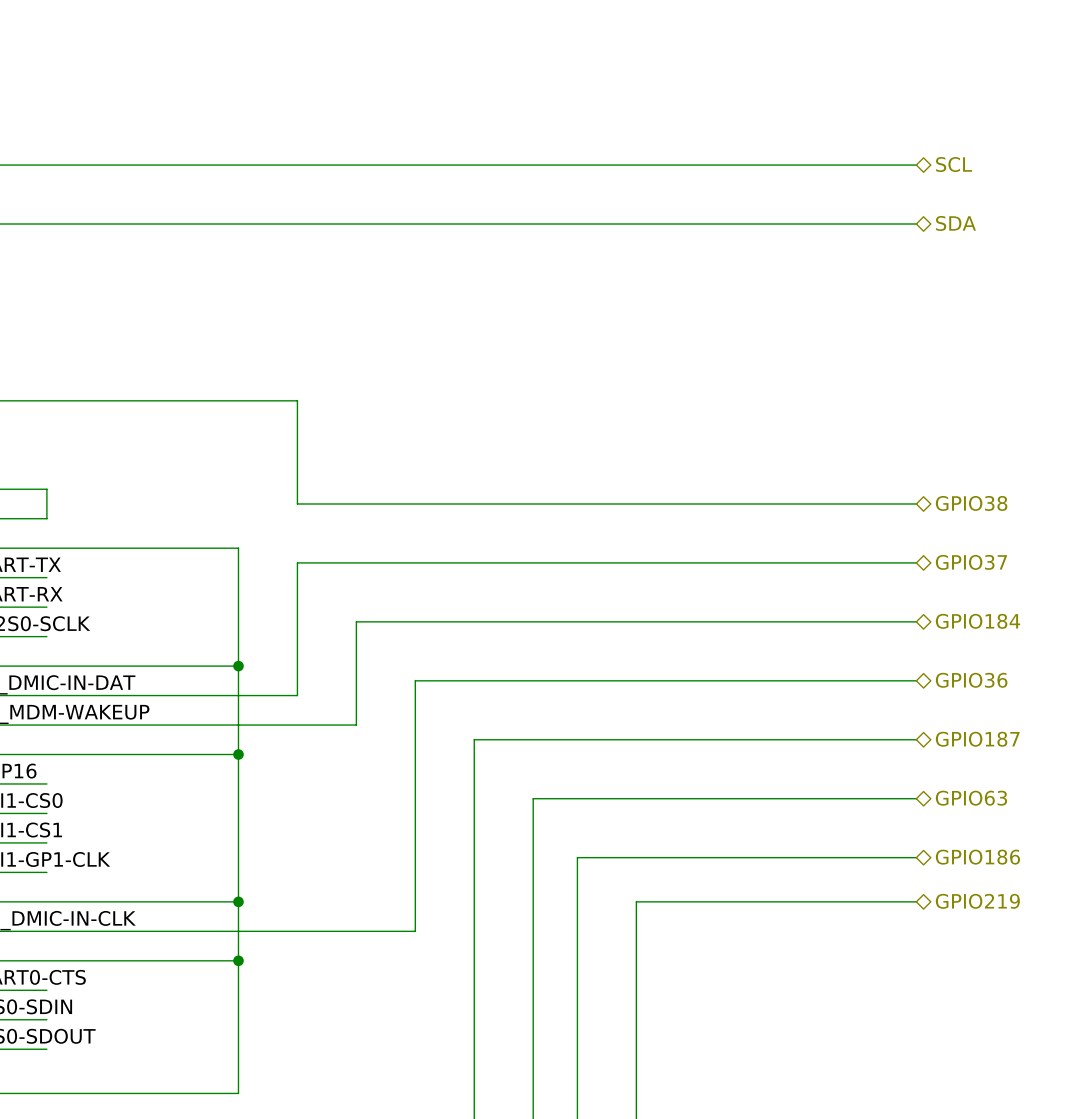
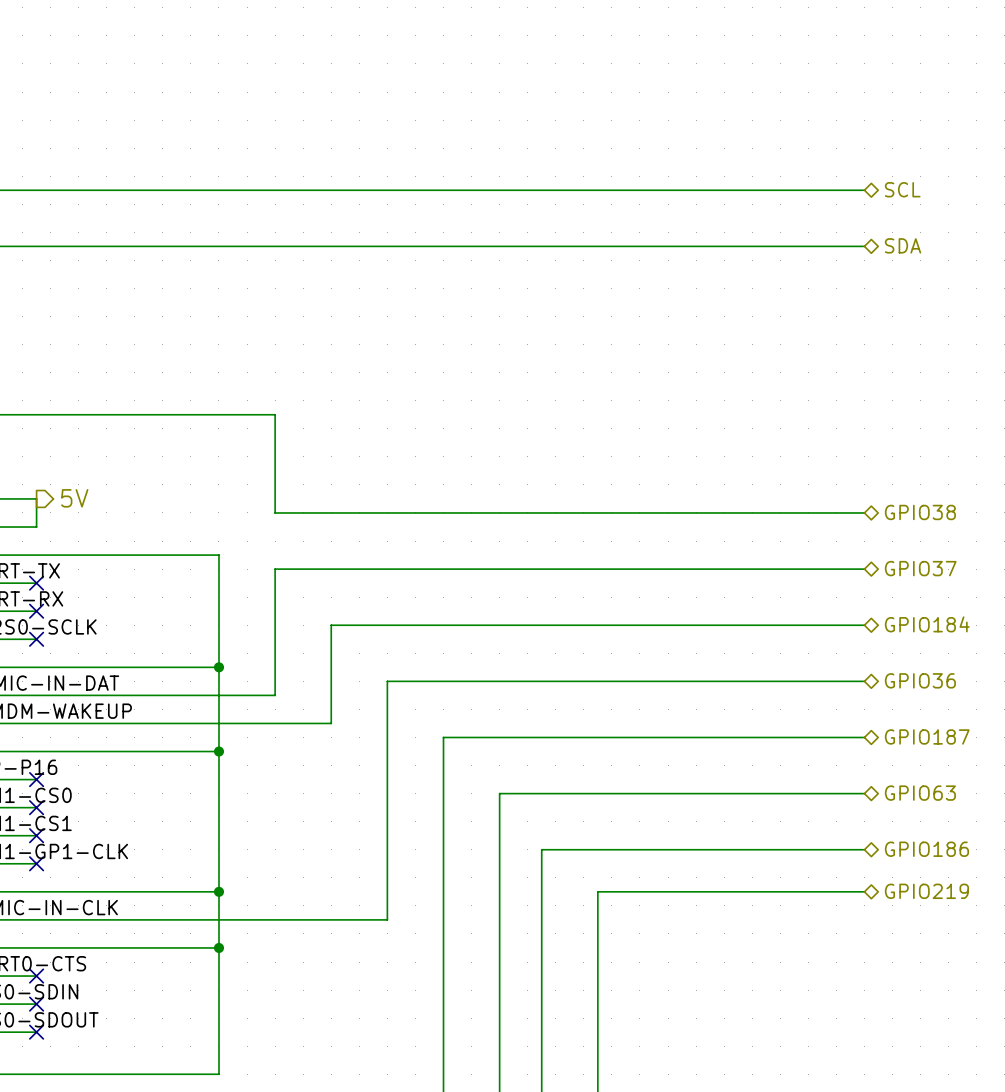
hierarchical label: none -> 5V (74, 498)
no-connect mark: none -> (36, 583)
no-connect mark: none -> (36, 611)
no-connect mark: none -> (36, 639)
no-connect mark: none -> (36, 779)
no-connect mark: none -> (36, 807)
no-connect mark: none -> (36, 835)
no-connect mark: none -> (36, 863)
no-connect mark: none -> (36, 976)
no-connect mark: none -> (36, 1004)
no-connect mark: none -> (36, 1032)

